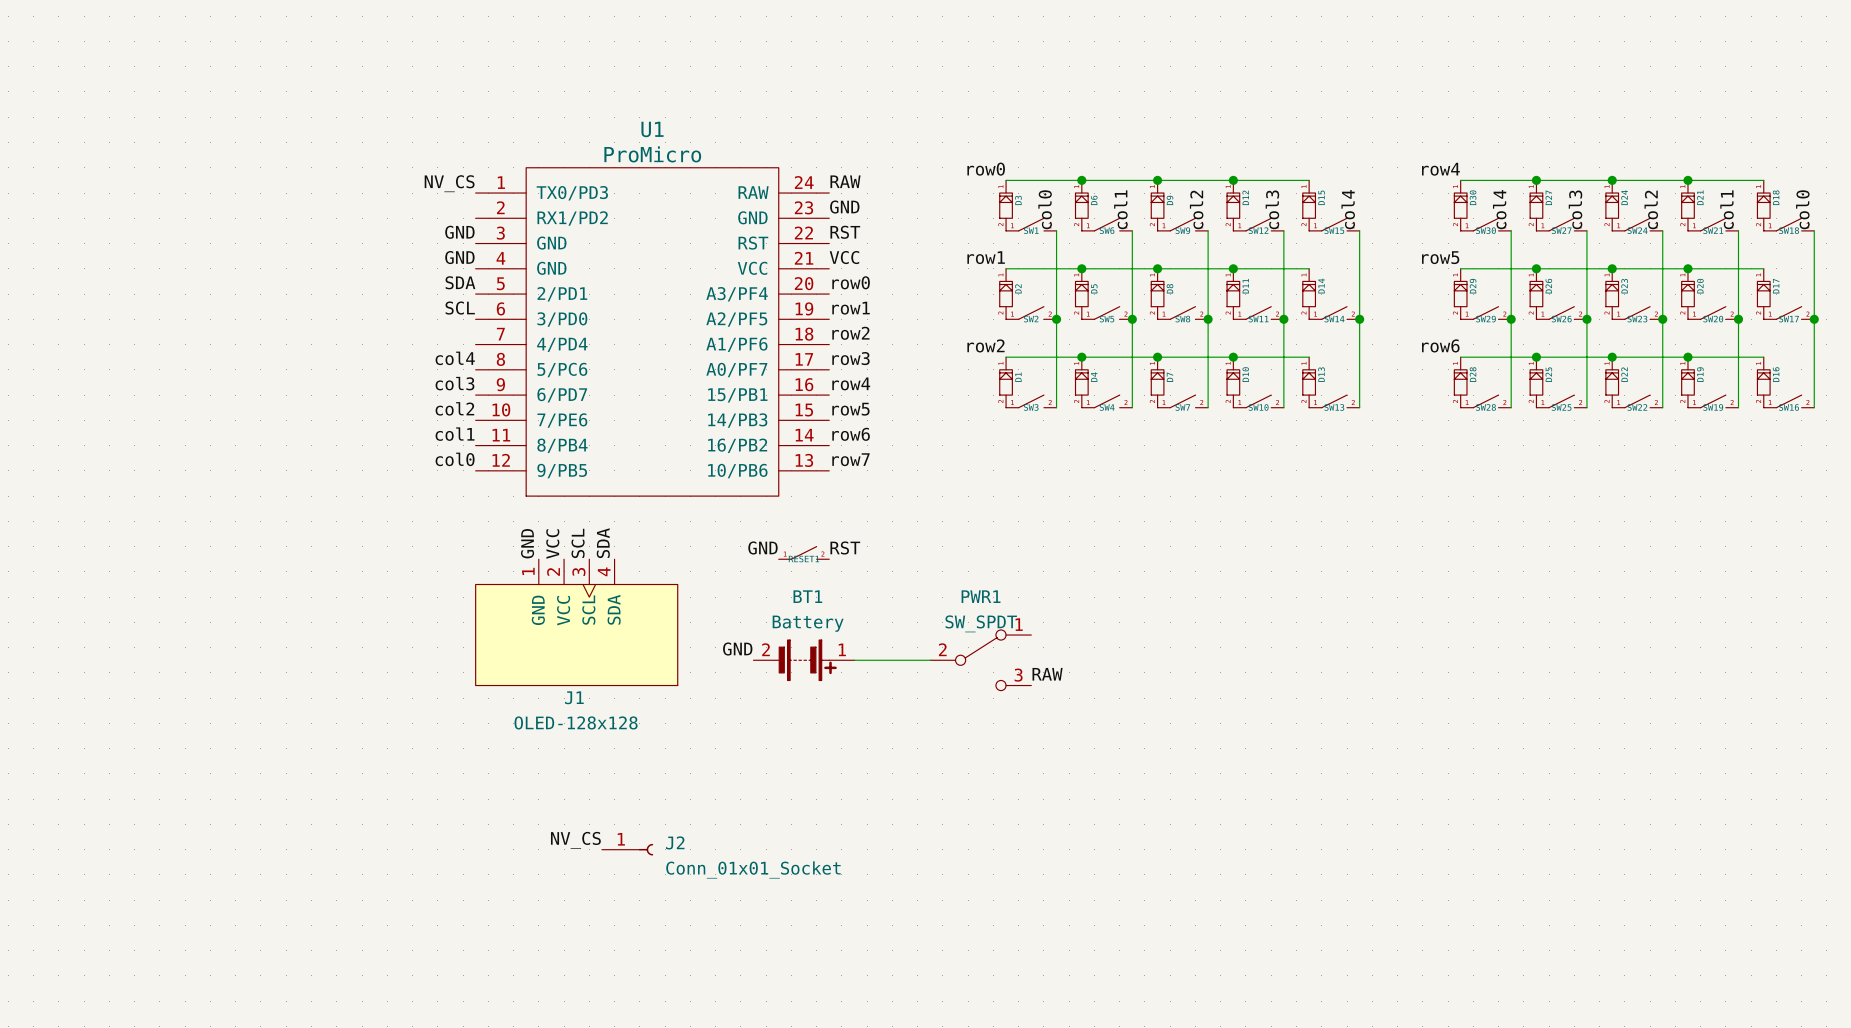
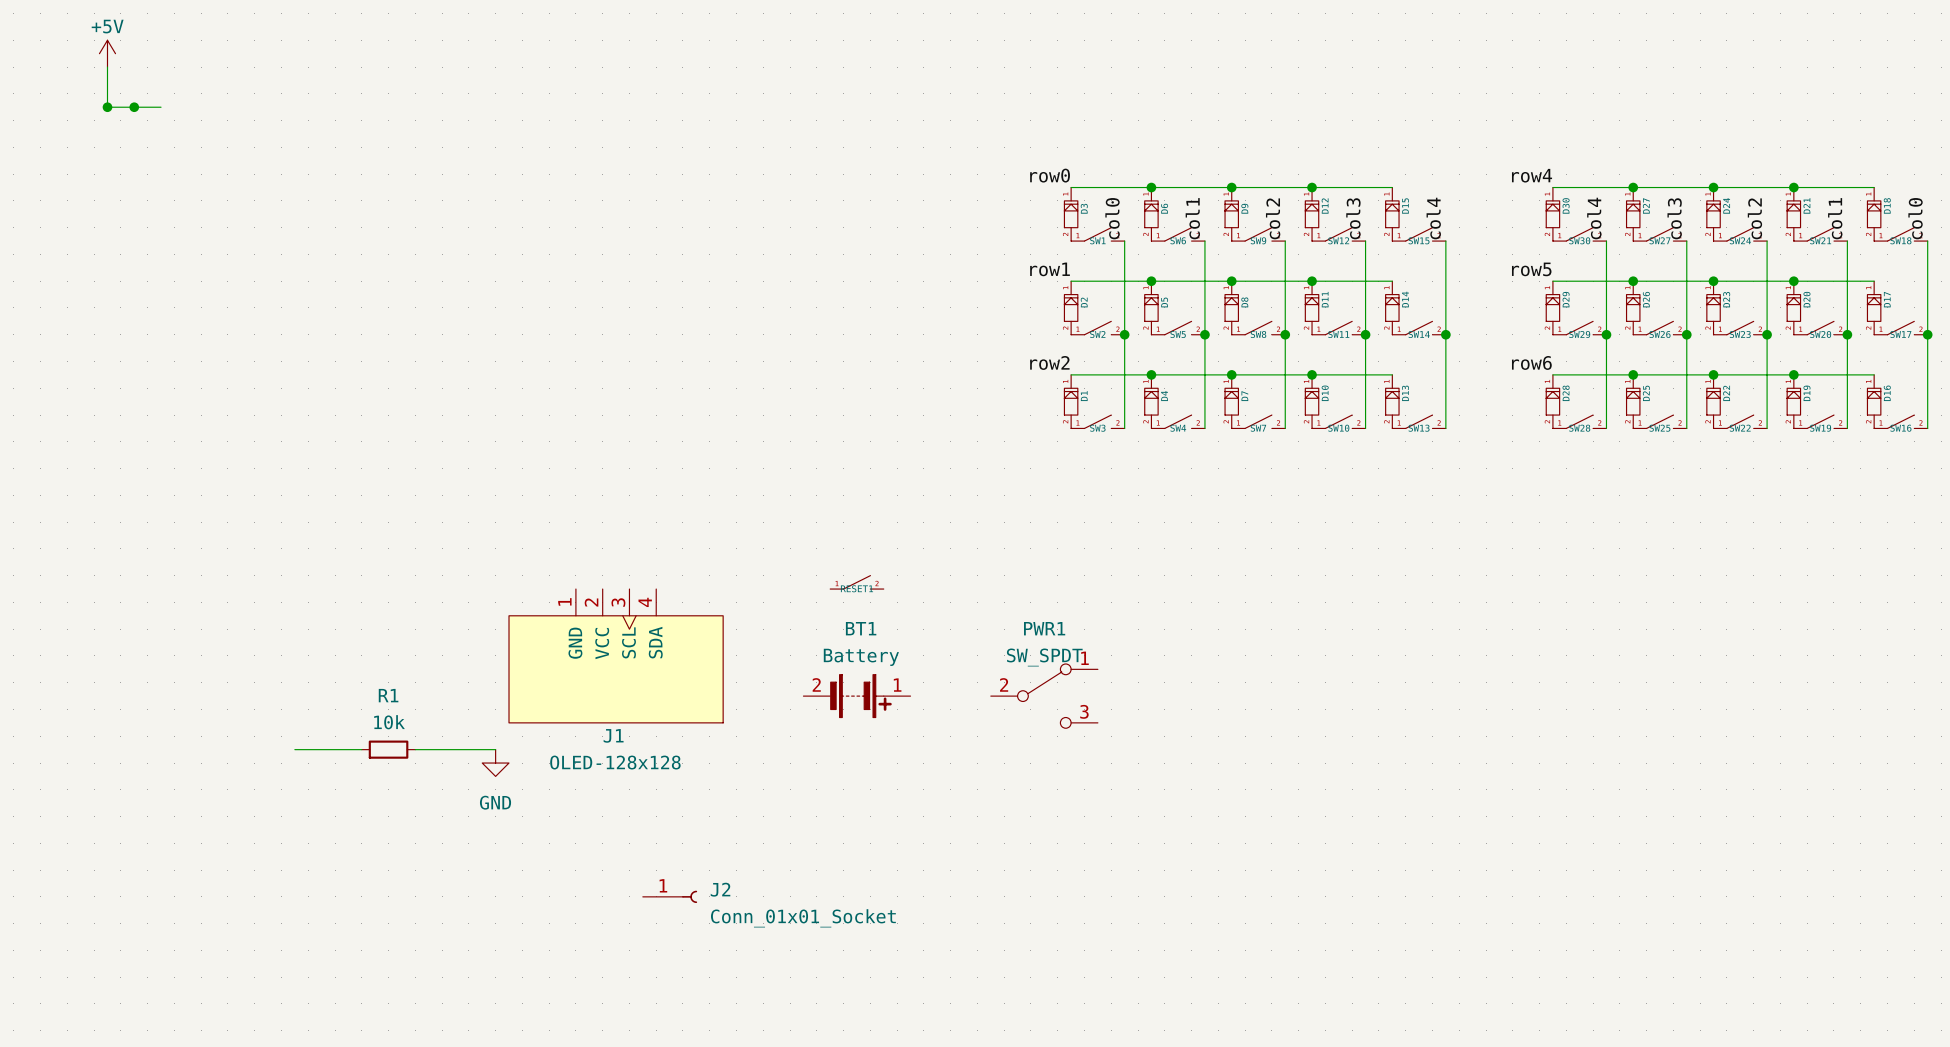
power symbol: none -> +5V (107, 53)
wire: none -> (107, 67) (107, 107) (161, 107)
junction: none -> (107, 107)
junction: none -> (134, 107)
label: RAW (845, 181) -> none
label: NV_CS (449, 183) -> none
label: GND (844, 207) -> none
label: GND (459, 232) -> none
label: RST (845, 232) -> none
label: GND (459, 257) -> none
label: VCC (844, 257) -> none
label: SDA (460, 282) -> none
label: row0 (851, 282) -> none
label: SCL (460, 308) -> none
label: row1 (851, 308) -> none
U1: ProMicro (652, 331) -> none
label: row2 (850, 333) -> none
label: col4 (455, 358) -> none
label: row3 (850, 358) -> none
label: col3 (454, 383) -> none
label: row4 (851, 383) -> none
label: col2 (454, 408) -> none
label: row5 (850, 409) -> none
label: col1 (455, 434) -> none
label: row6 (851, 434) -> none
label: col0 (455, 459) -> none
label: row7 (850, 459) -> none
label: GND (527, 543) -> none
label: SCL (578, 543) -> none
label: SDA (603, 543) -> none
label: VCC (552, 544) -> none
label: GND (762, 547) -> none
label: RST (845, 547) -> none
label: GND (737, 649) -> none
wire: (854, 660) (930, 660) -> none
label: RAW (1047, 674) -> none
wire: none -> (294, 749) (361, 749)
R1: none -> 10k (388, 749)
wire: none -> (415, 749) (495, 749)
power symbol: none -> GND (495, 763)
label: NV_CS (575, 840) -> none

